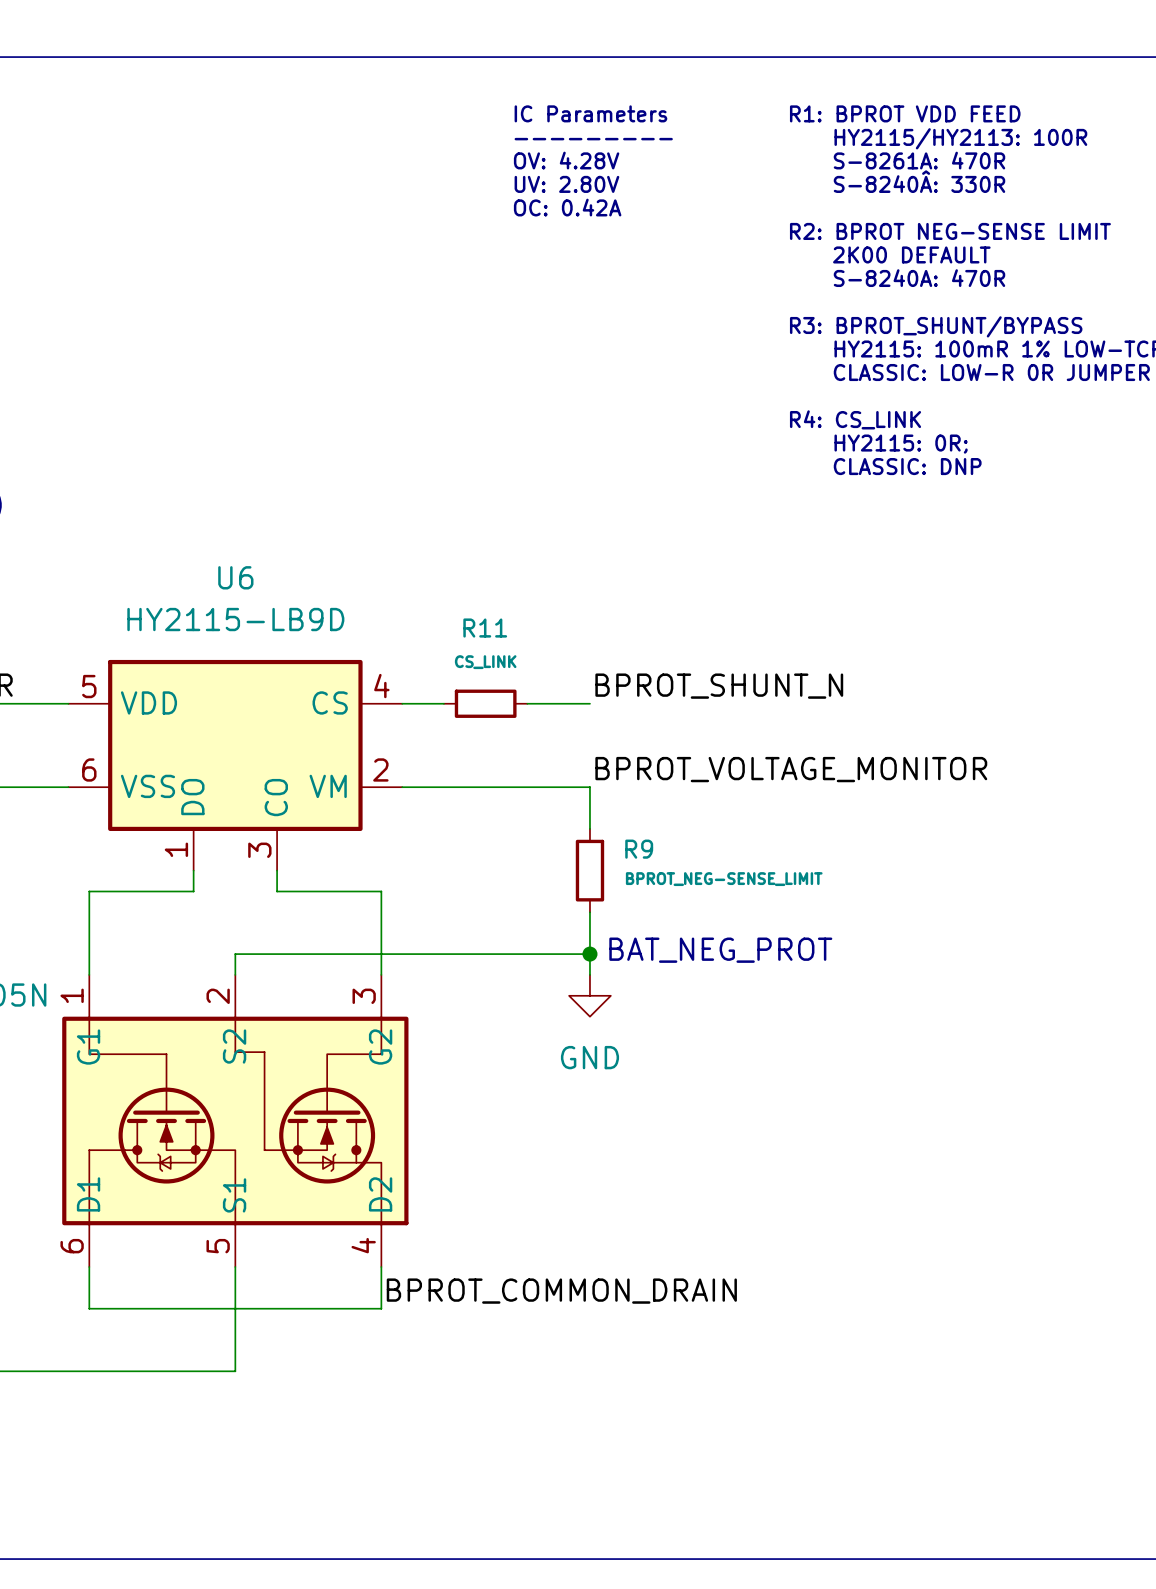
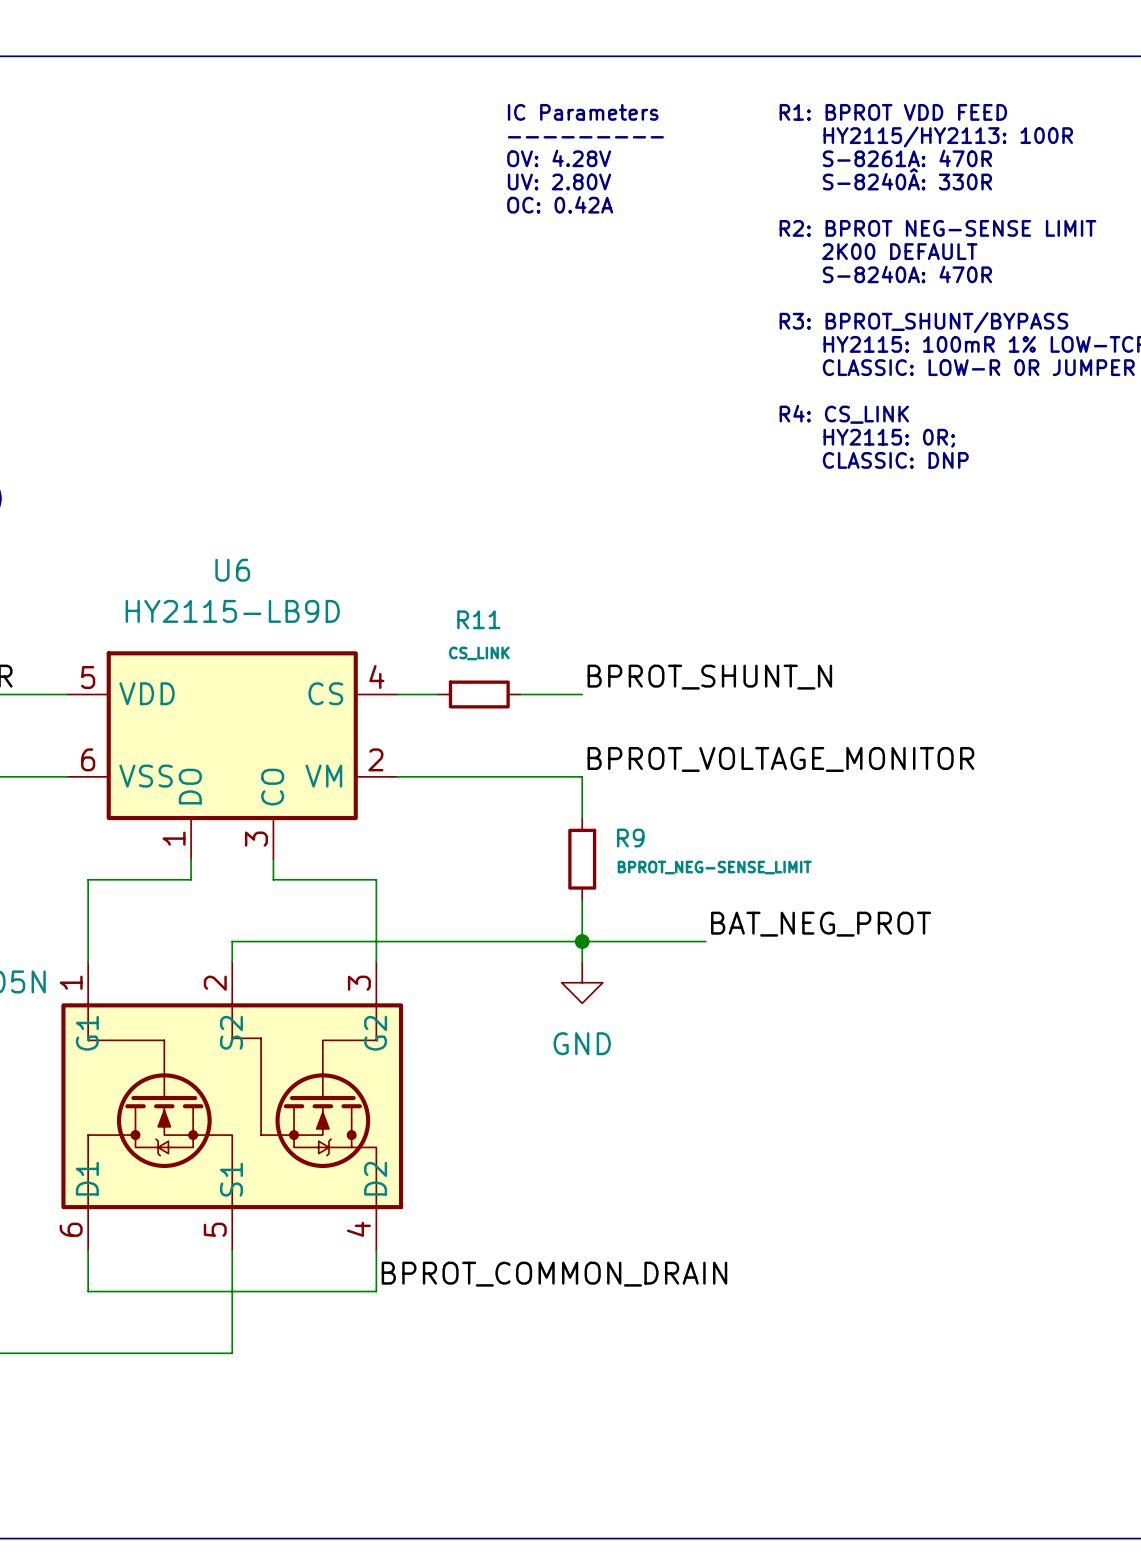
label: none -> BAT_NEG_PROT (821, 924)
text: BAT_NEG_PROT (720, 950) -> none
wire: none -> (582, 941) (705, 941)

